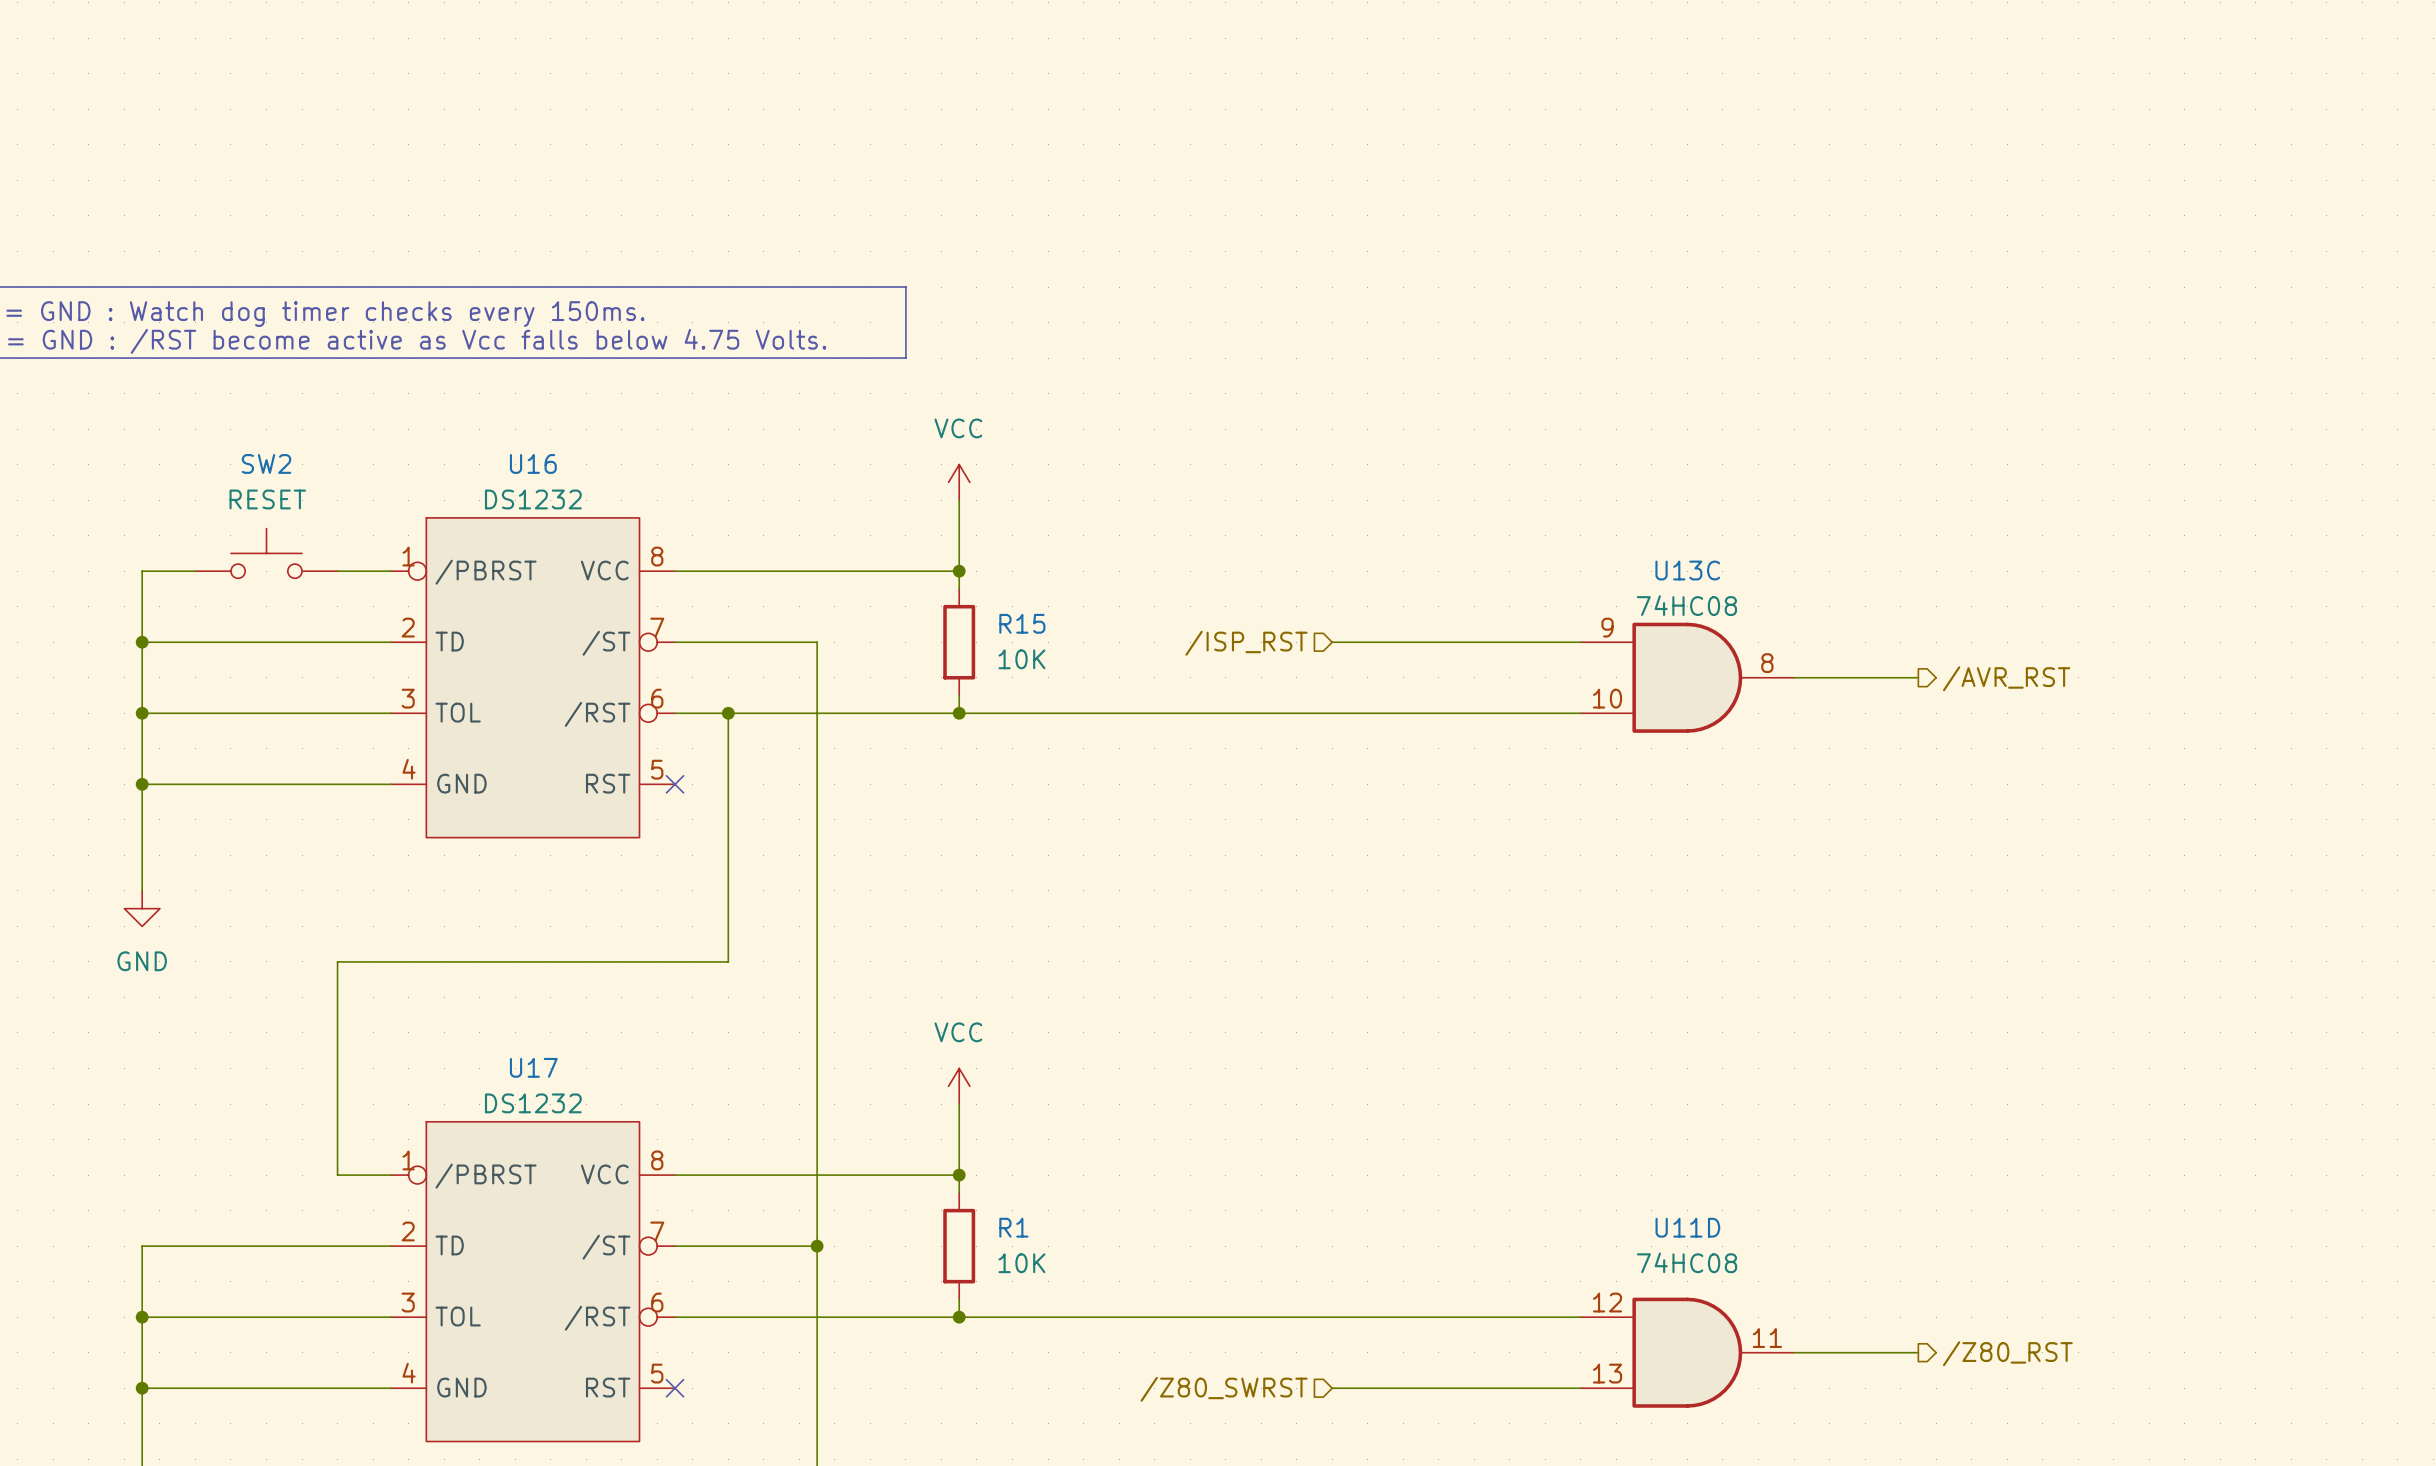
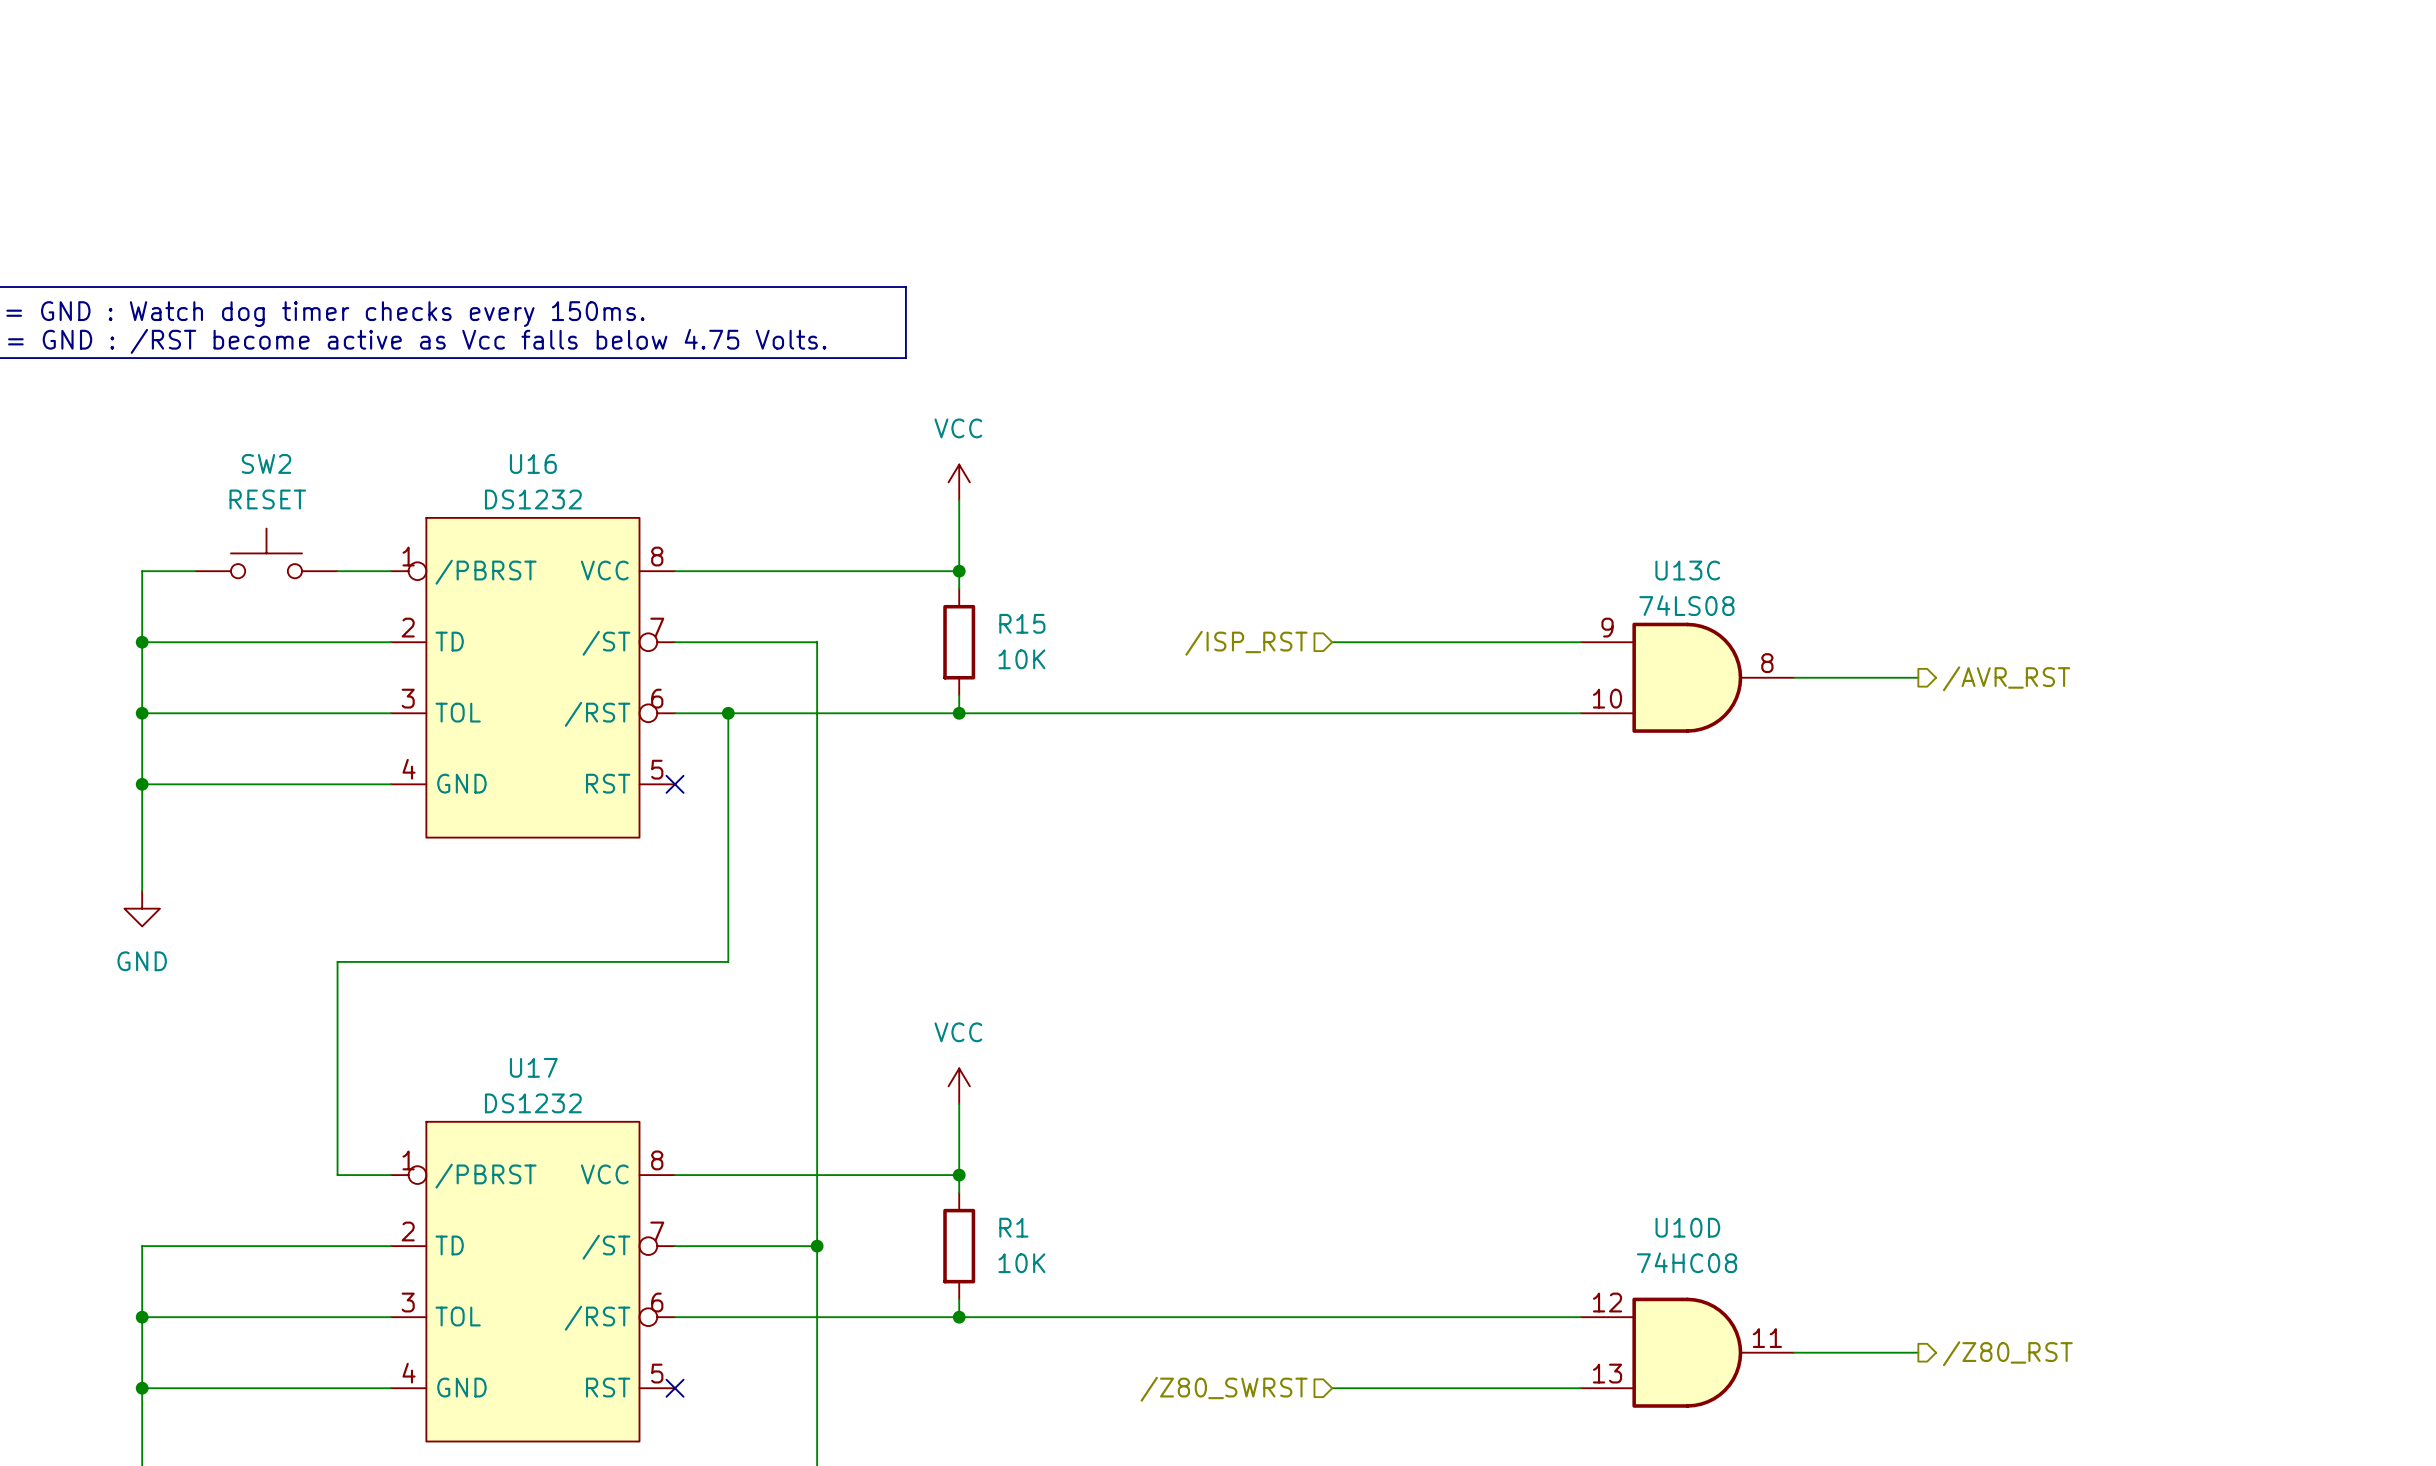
U13C value: 74HC08 (1686, 605) -> 74LS08 (1686, 605)
U11D name: U11D (1687, 1227) -> U10D (1687, 1227)

